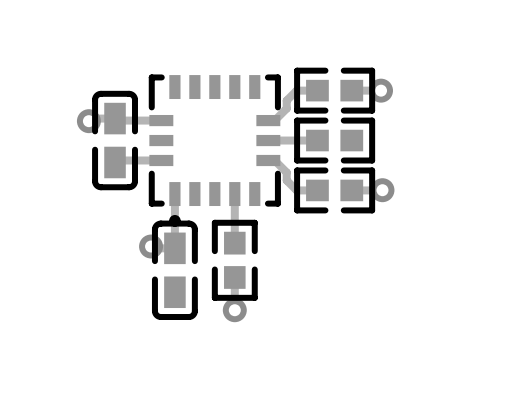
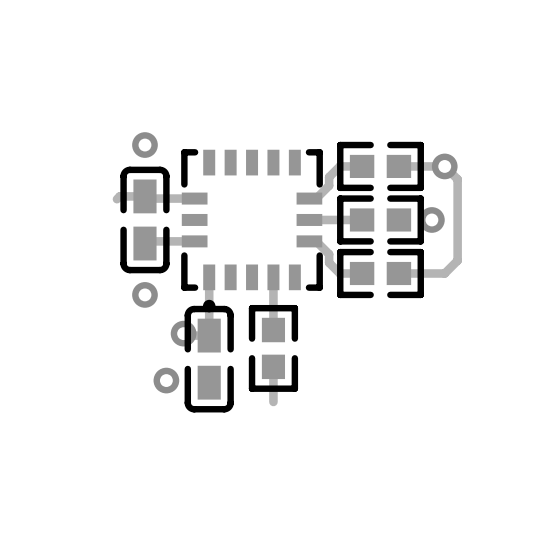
via: none -> (144, 145)
track: none -> (430, 166) (444, 166) (457, 179) (457, 260) (444, 273) (431, 273)
via position: (381, 90) -> (444, 166)
via: (88, 121) -> none
via: none -> (431, 219)
via: (382, 190) -> none
via: none -> (144, 294)
via: none -> (166, 380)
via: (234, 310) -> none

